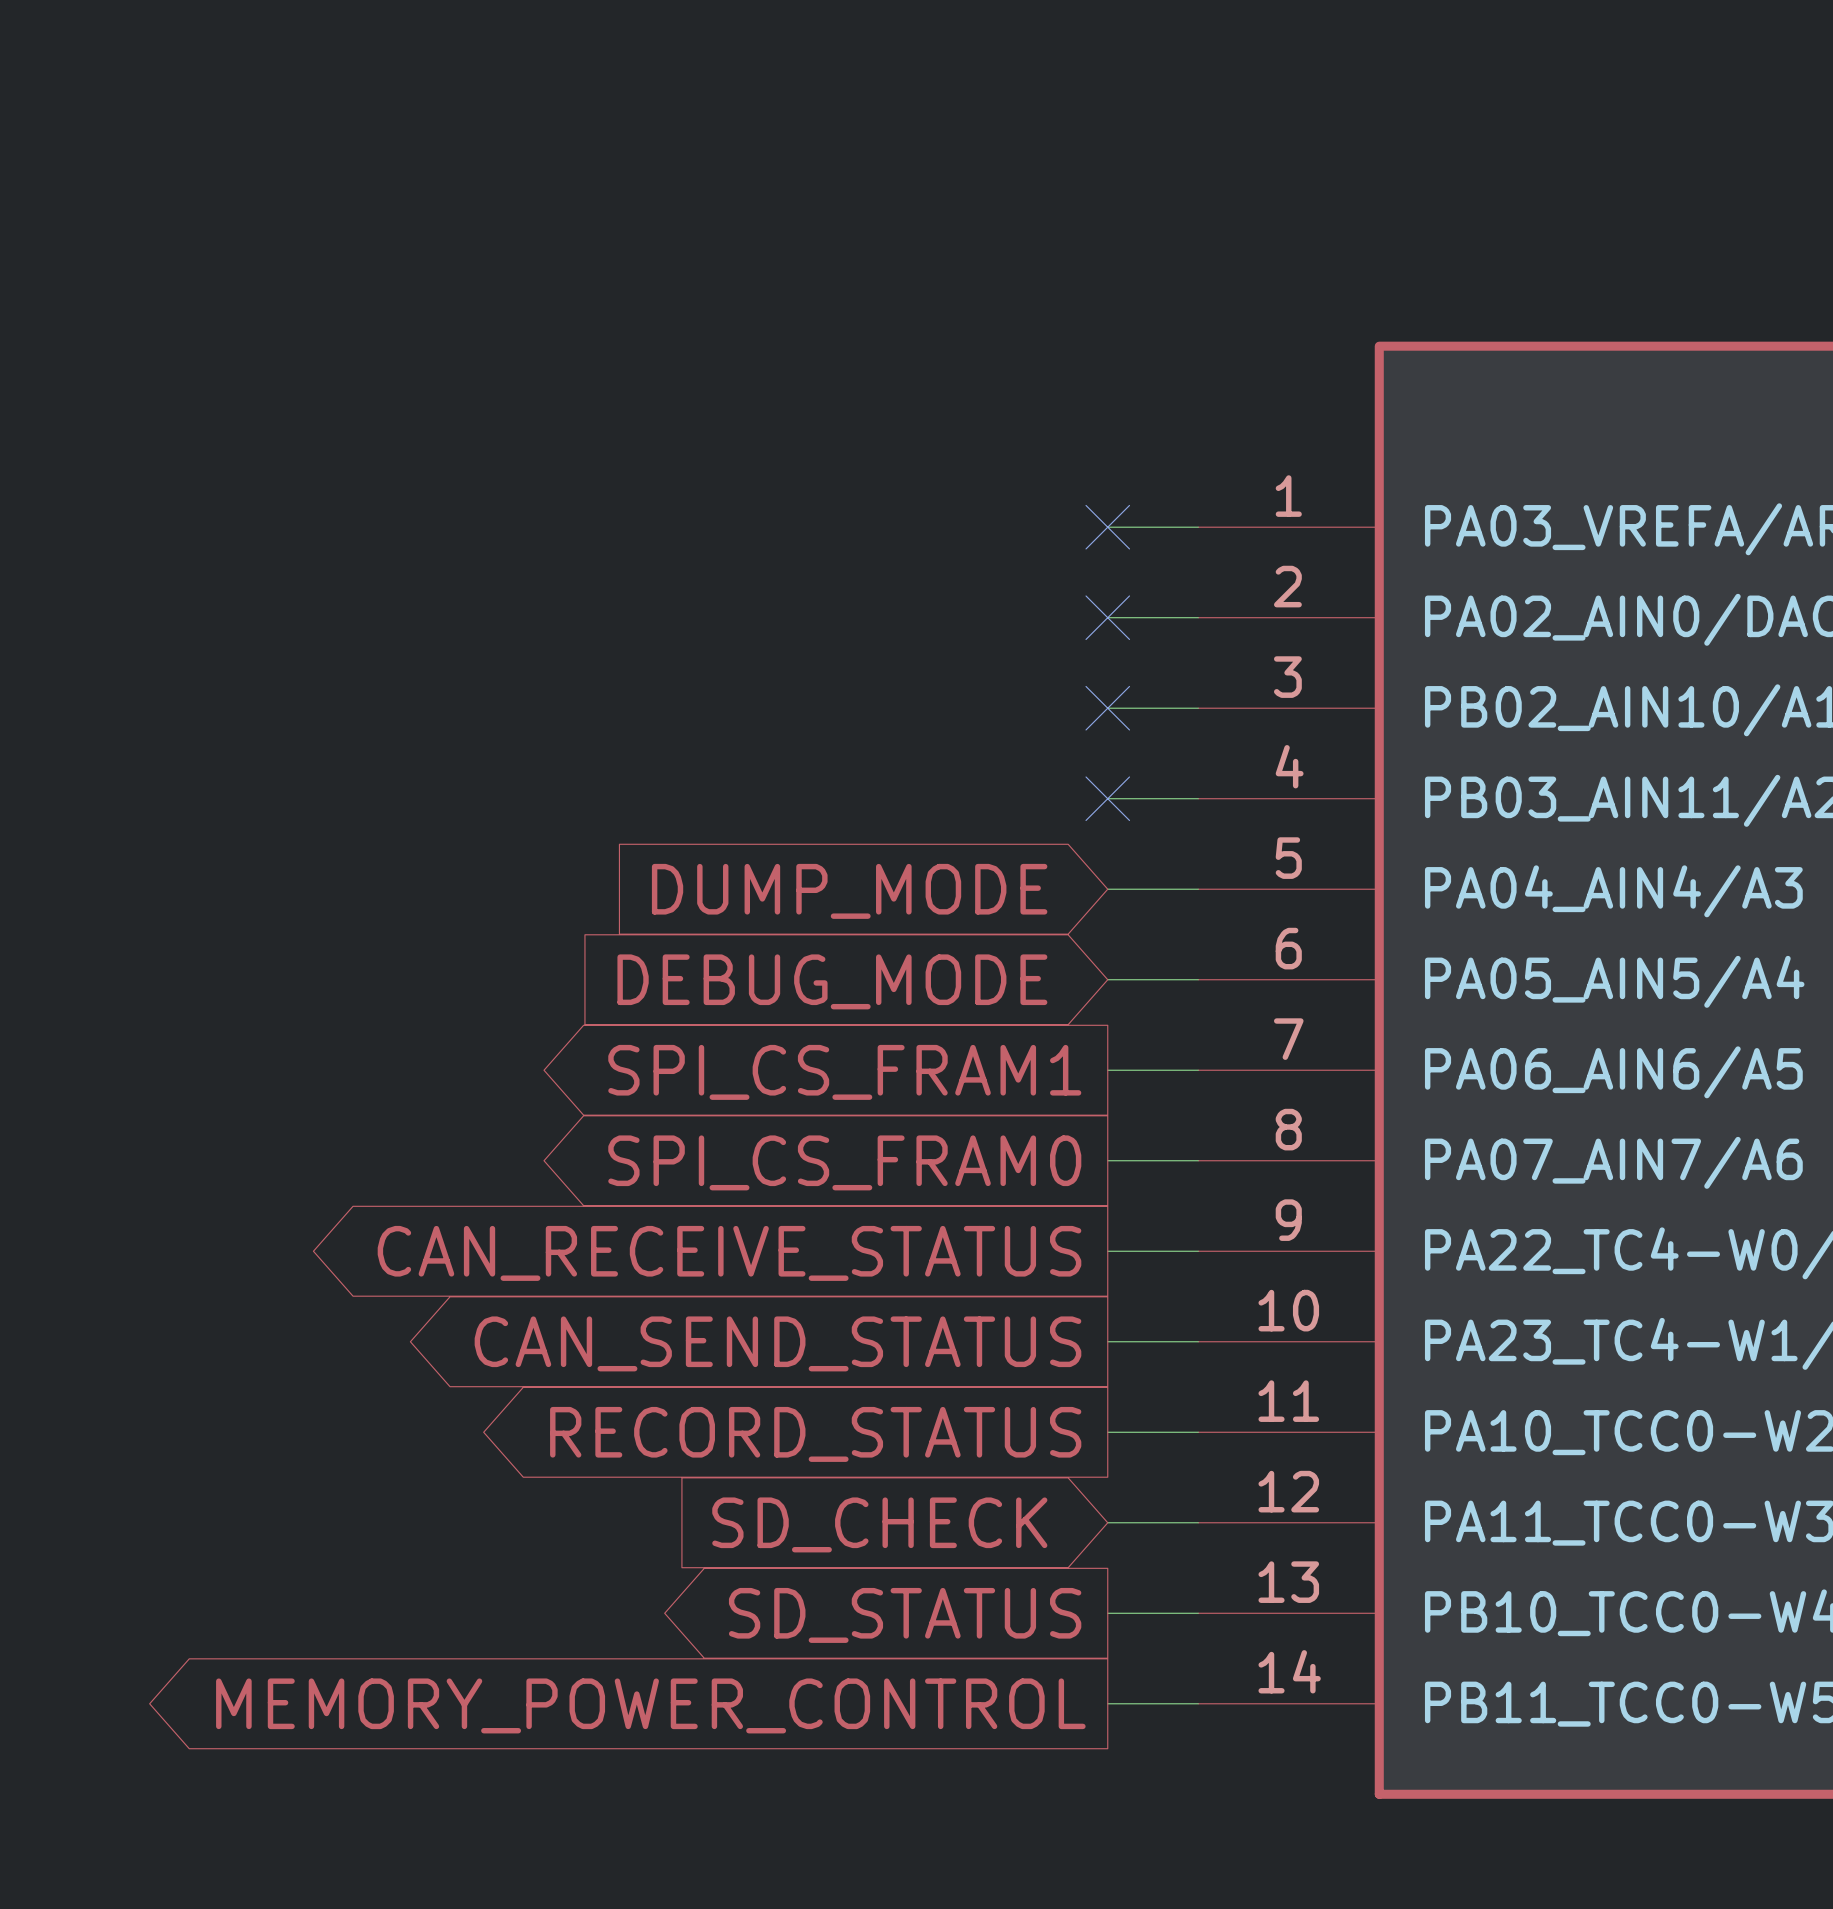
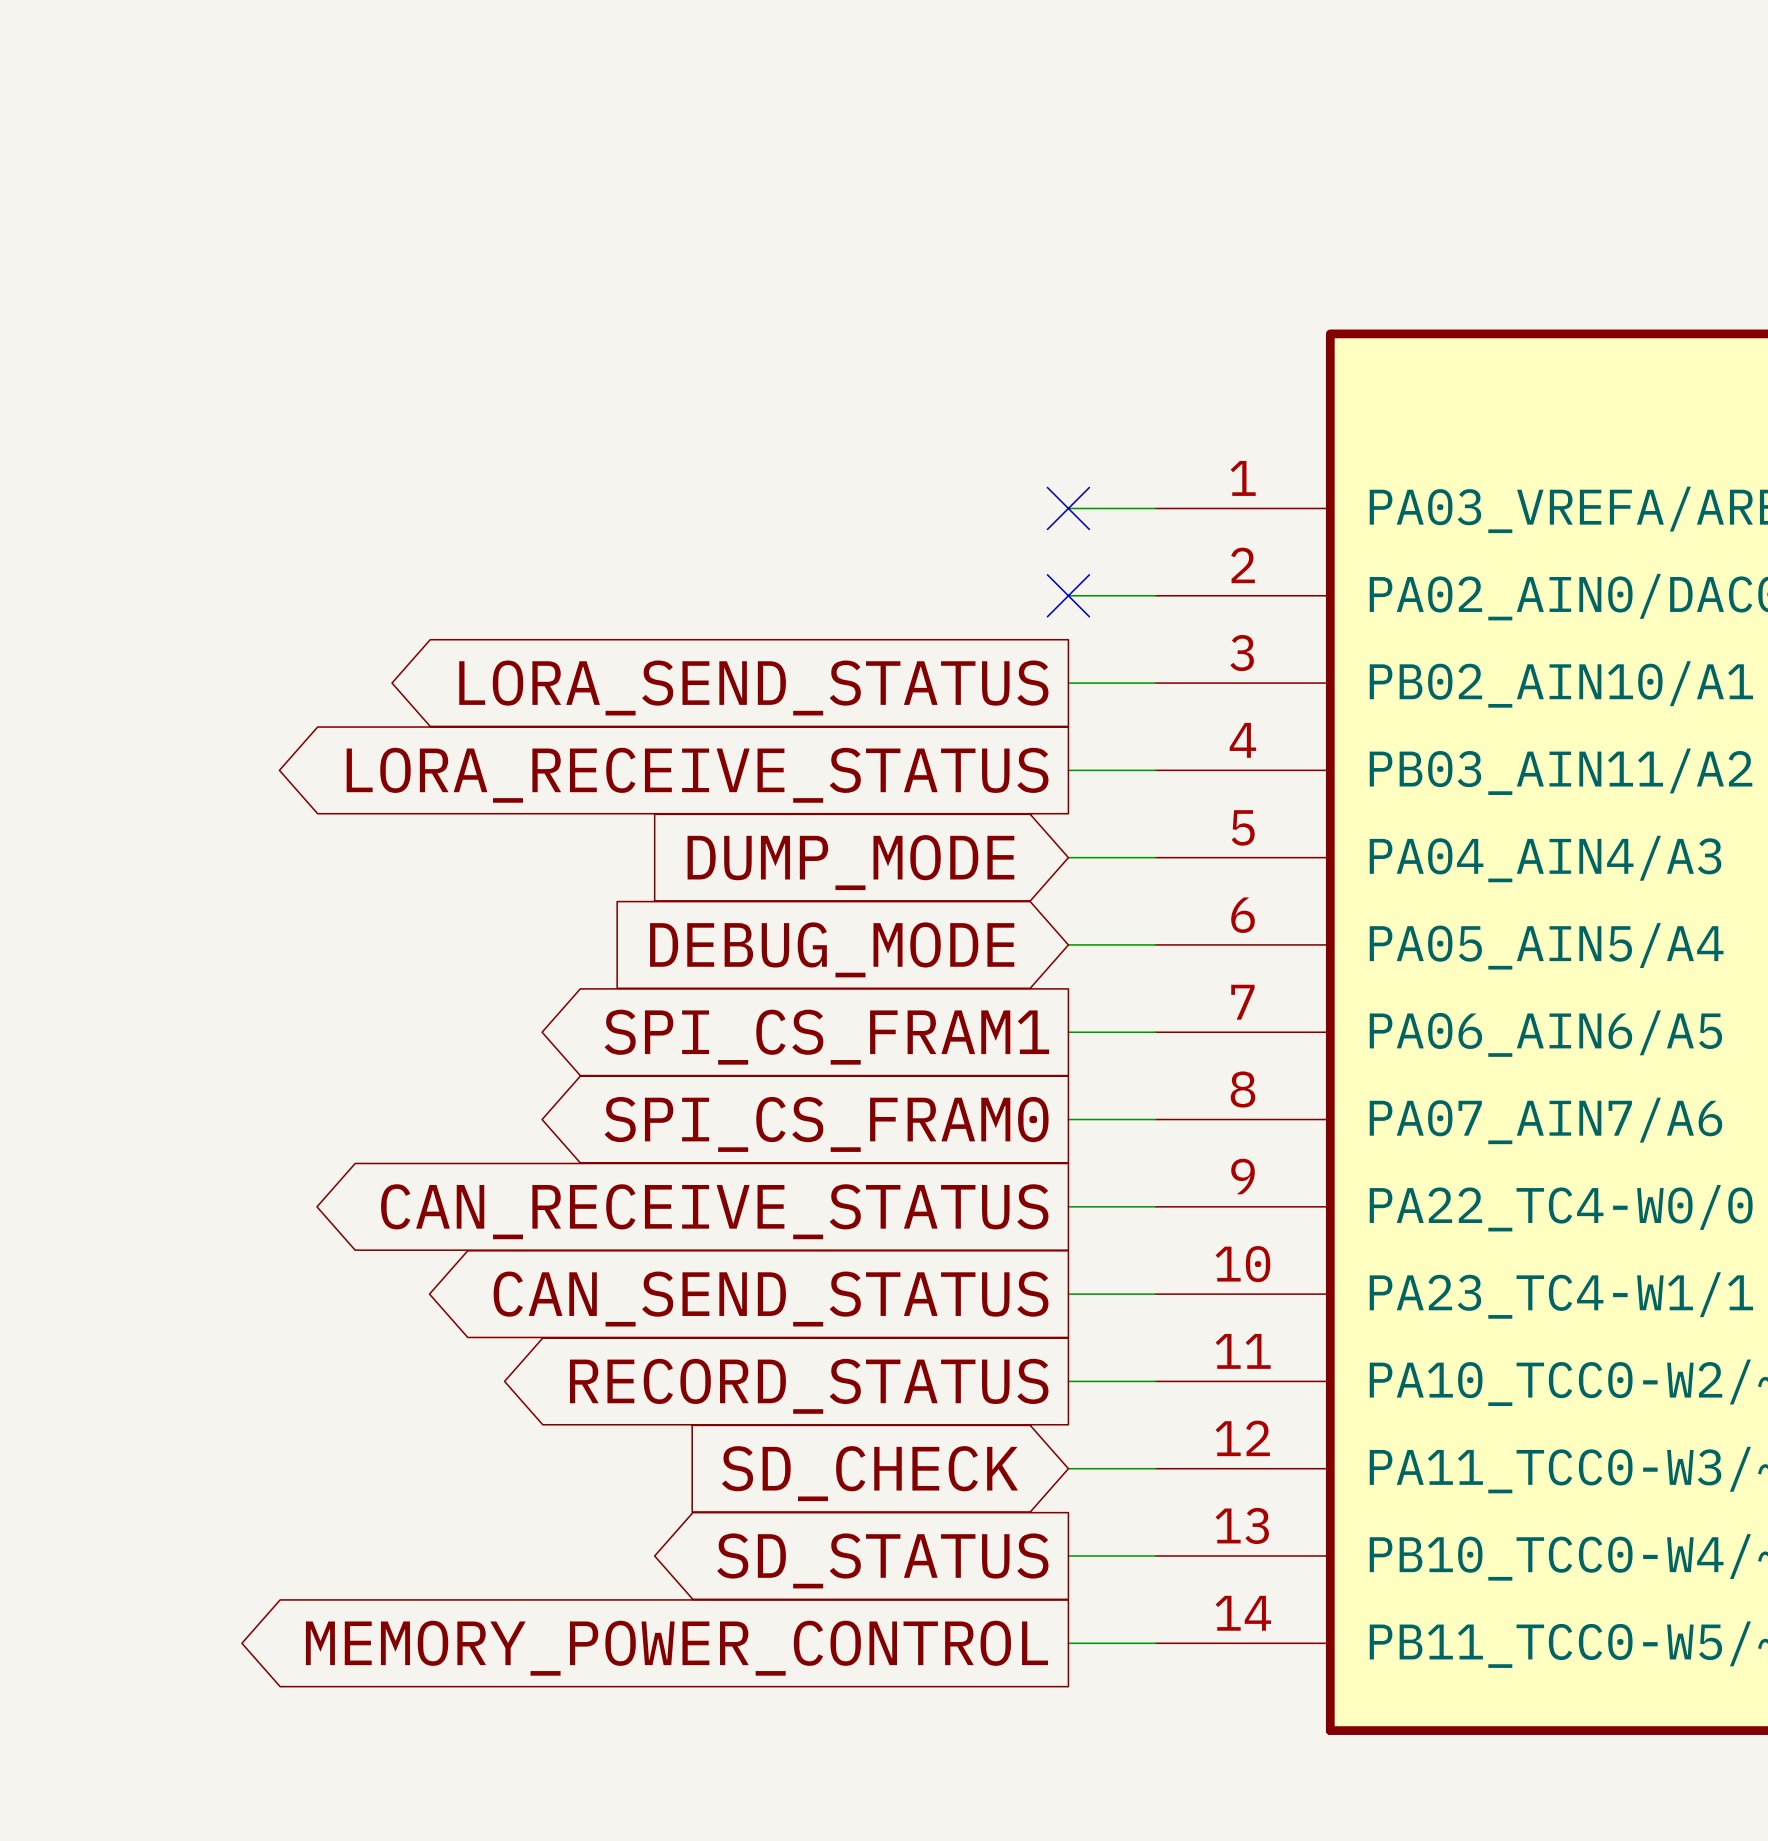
no-connect mark: (1107, 708) -> none
global label: none -> LORA_SEND_STATUS (753, 687)
no-connect mark: (1107, 798) -> none
global label: none -> LORA_RECEIVE_STATUS (697, 775)

